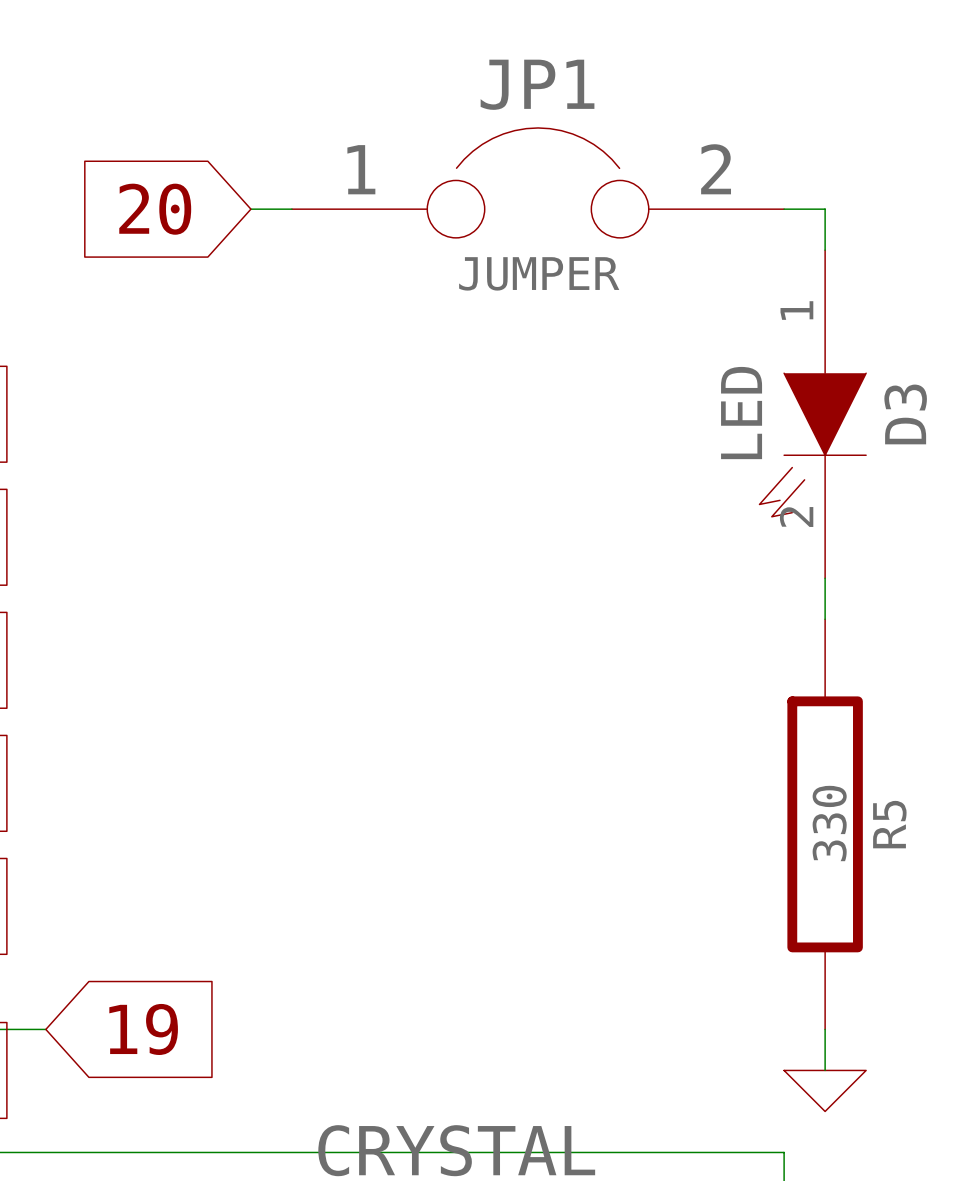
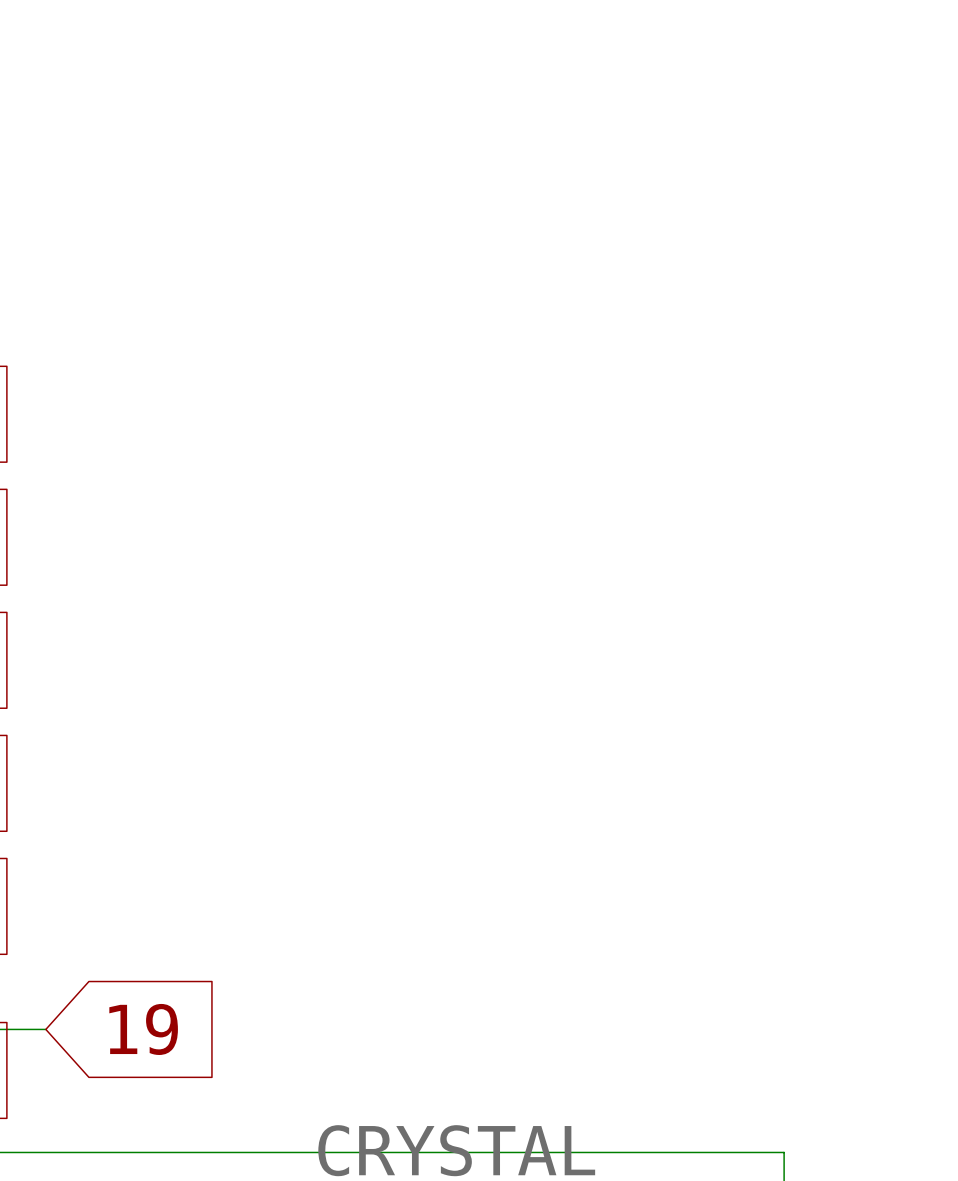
JP1: JUMPER (538, 182) -> none
global label: 20 (155, 209) -> none
wire: (250, 209) (291, 209) -> none
wire: (784, 209) (825, 209) (825, 250) -> none
D3: LED (812, 414) -> none
wire: (825, 578) (825, 619) -> none
R5: 330 (825, 824) -> none
wire: (825, 1029) (825, 1070) -> none
power symbol: (825, 1090) -> none

